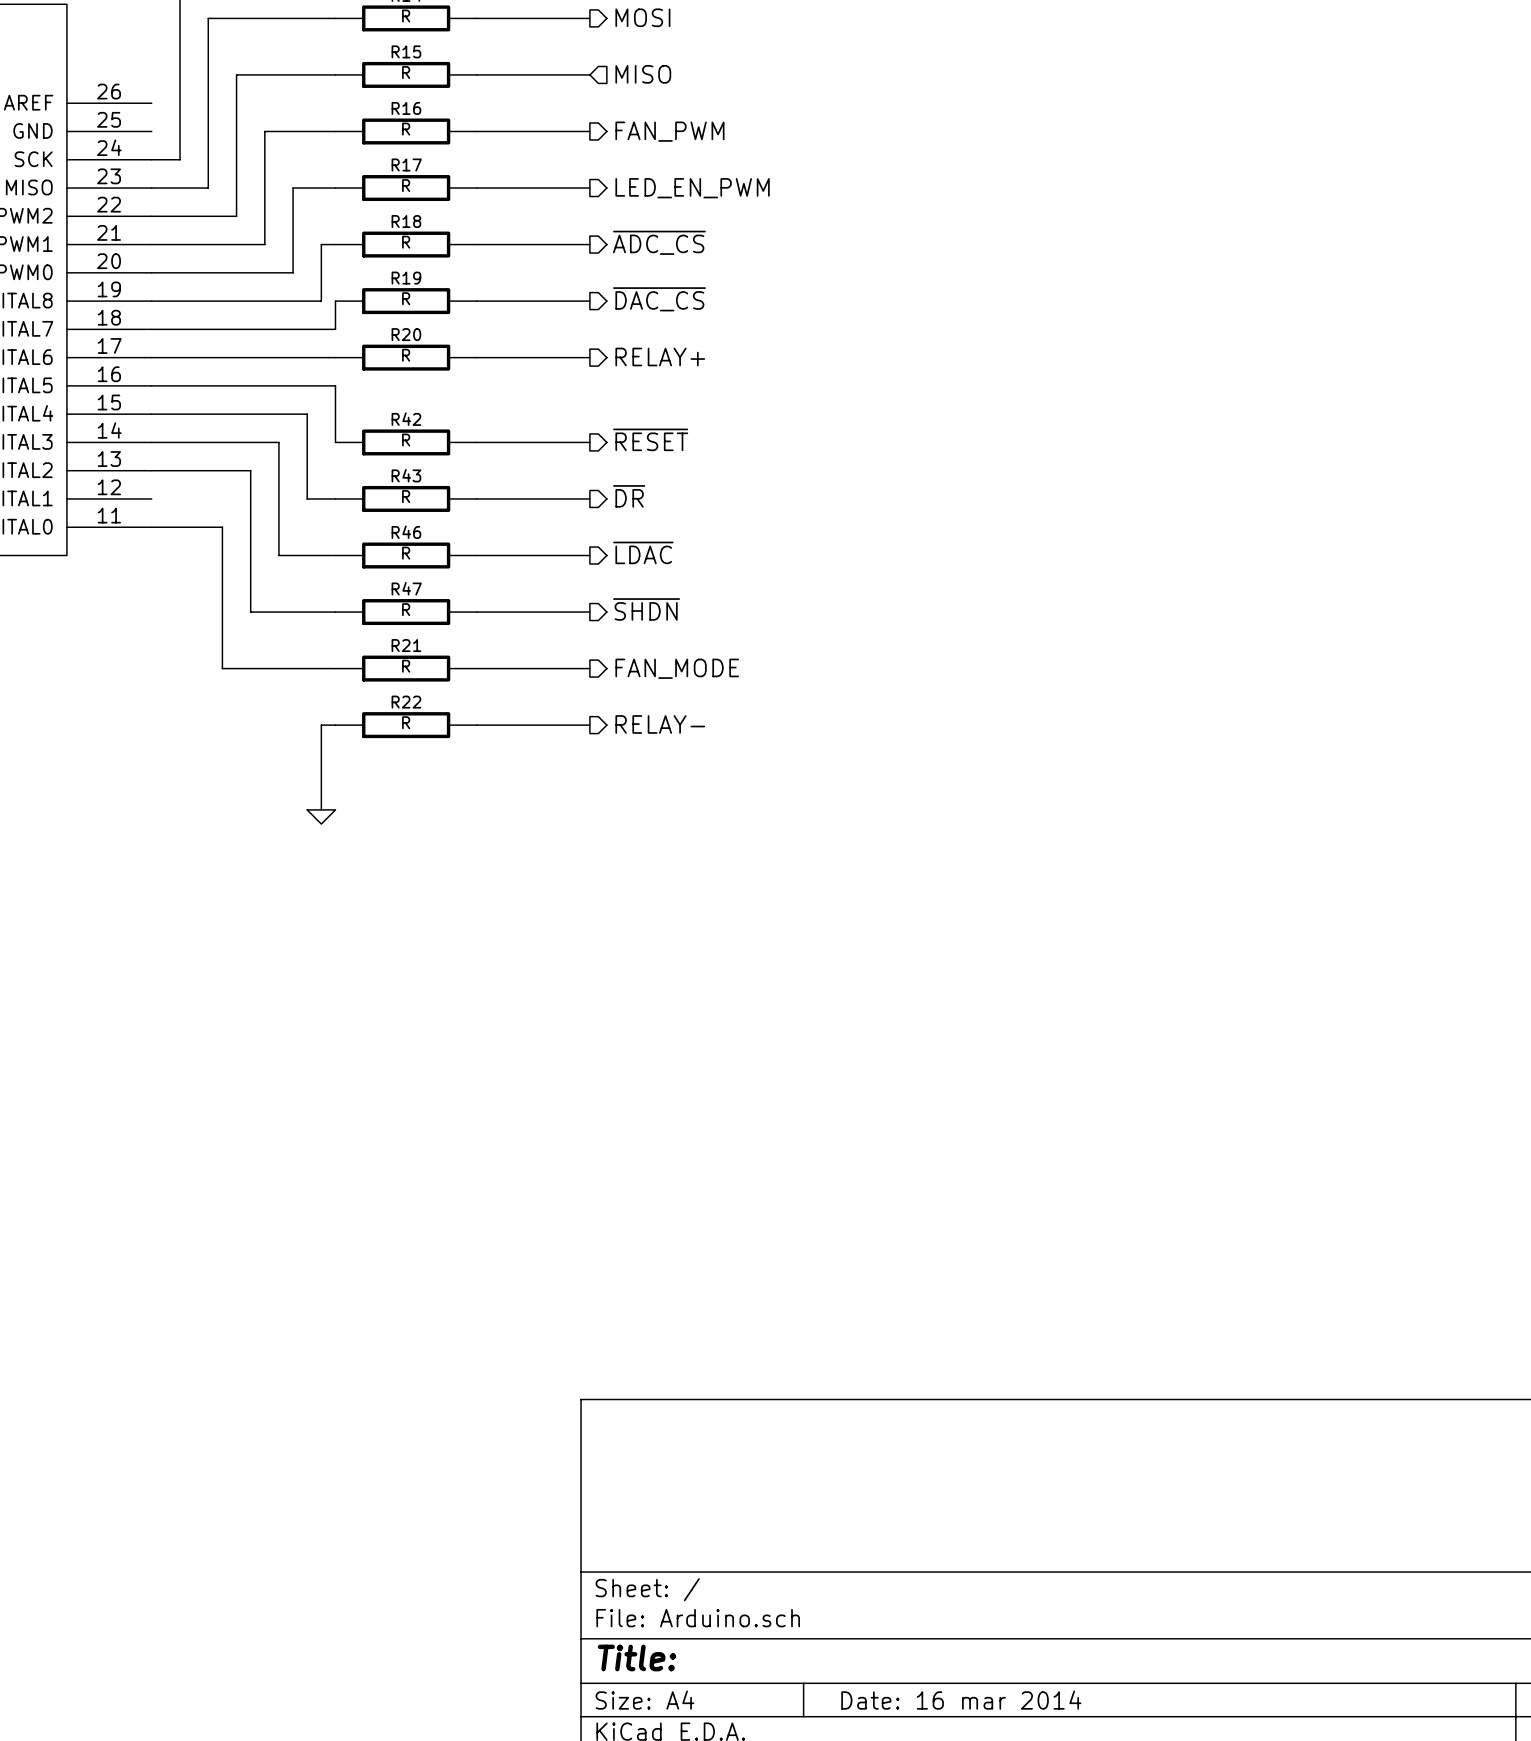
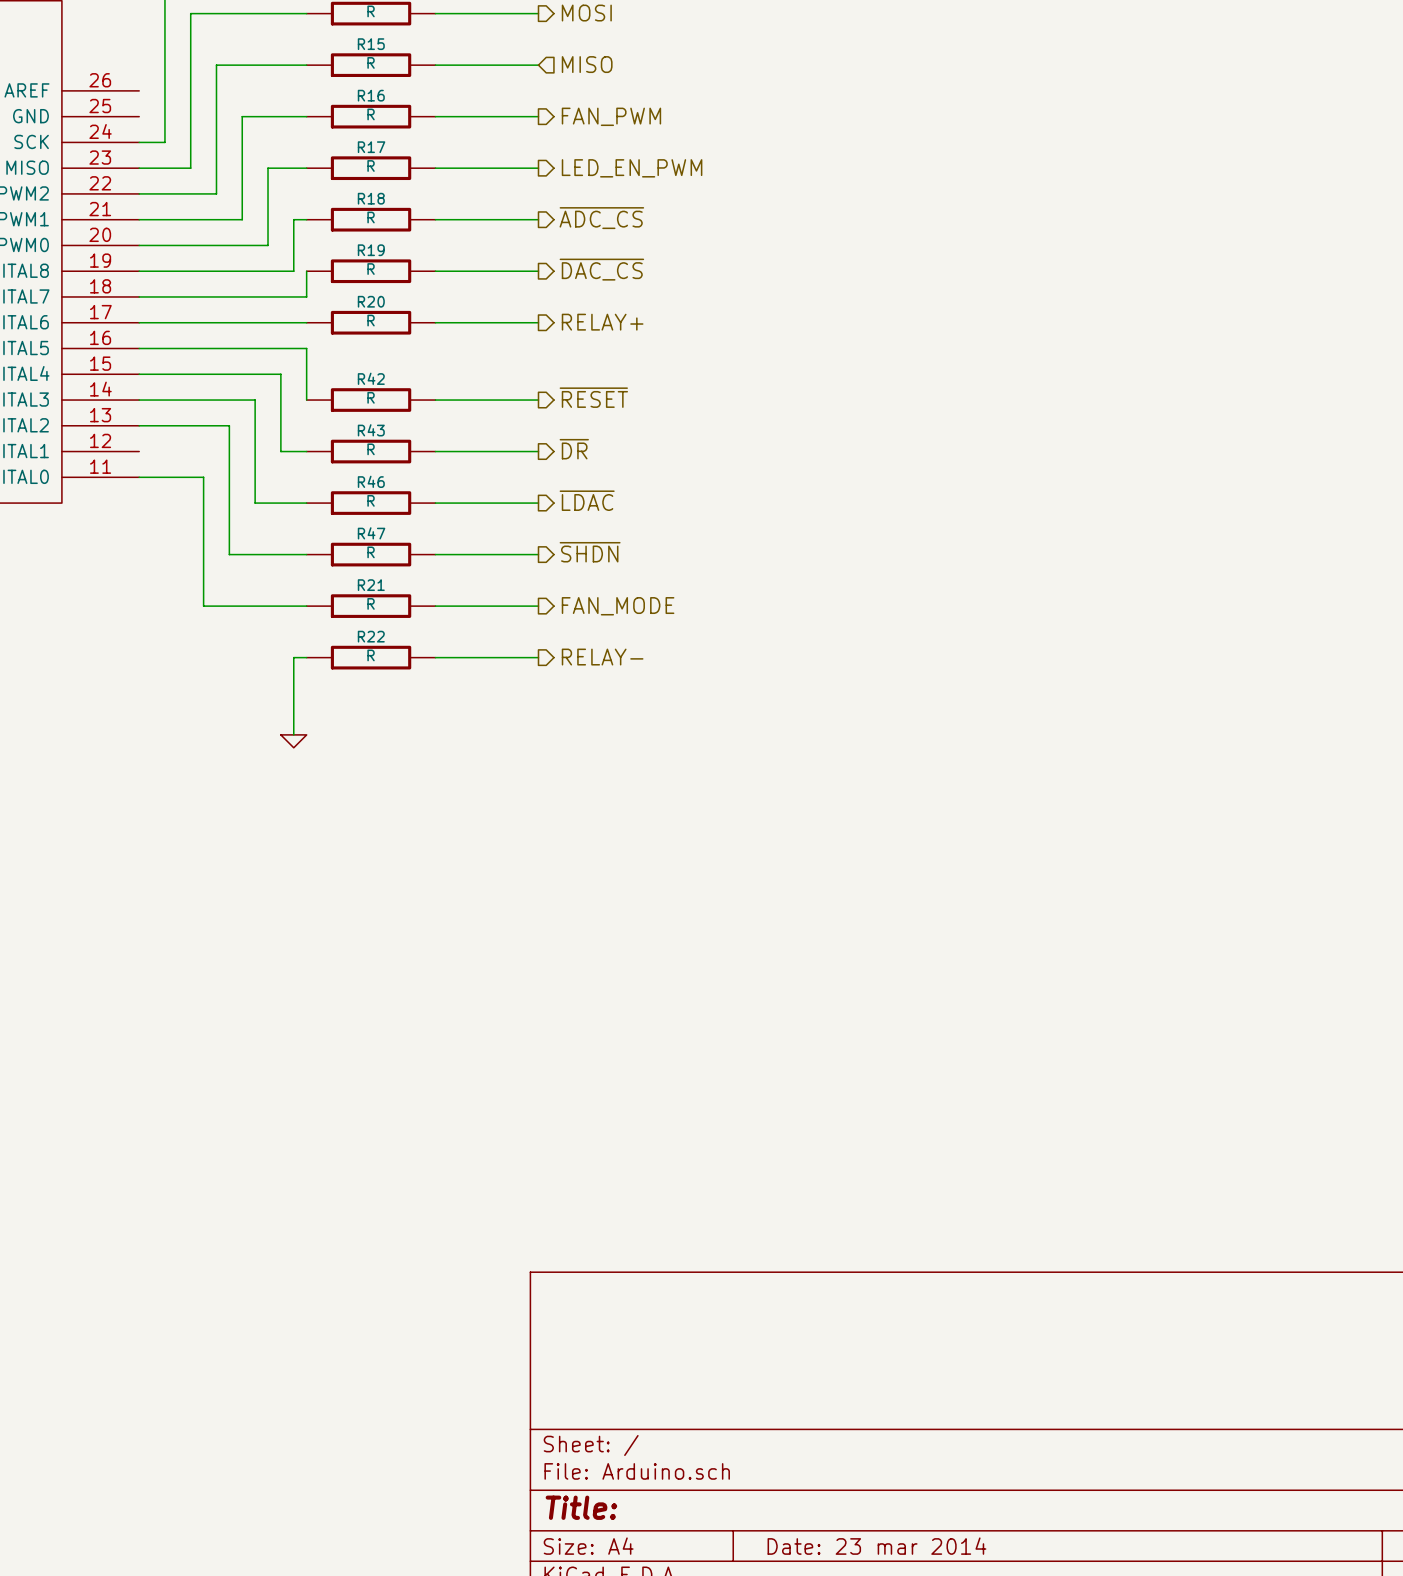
title block: Date: 16 mar 2014 (961, 1700) -> Date: 23 mar 2014 (876, 1546)

